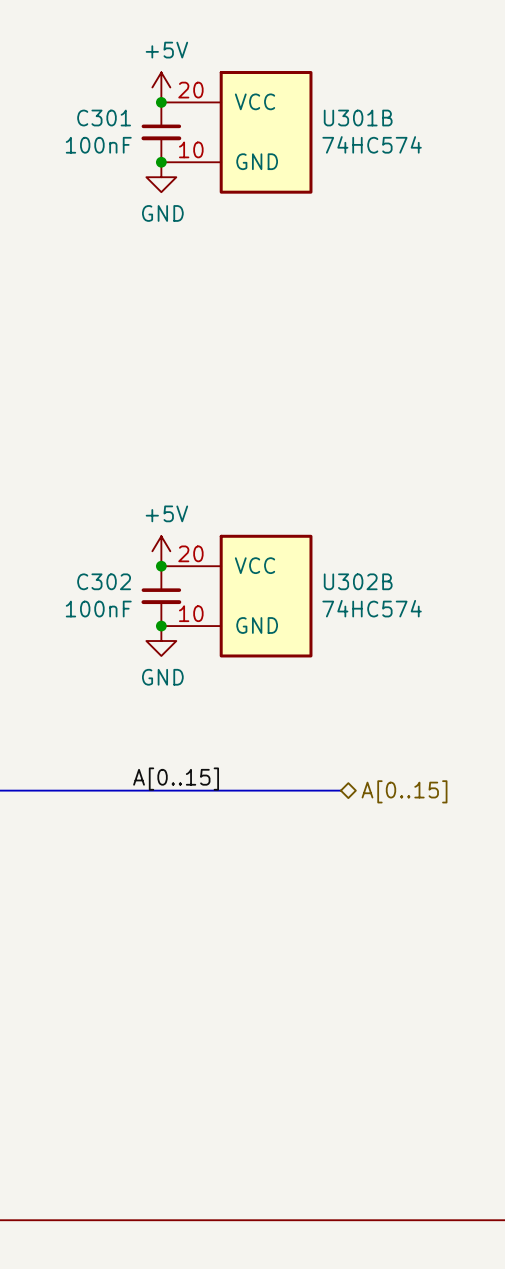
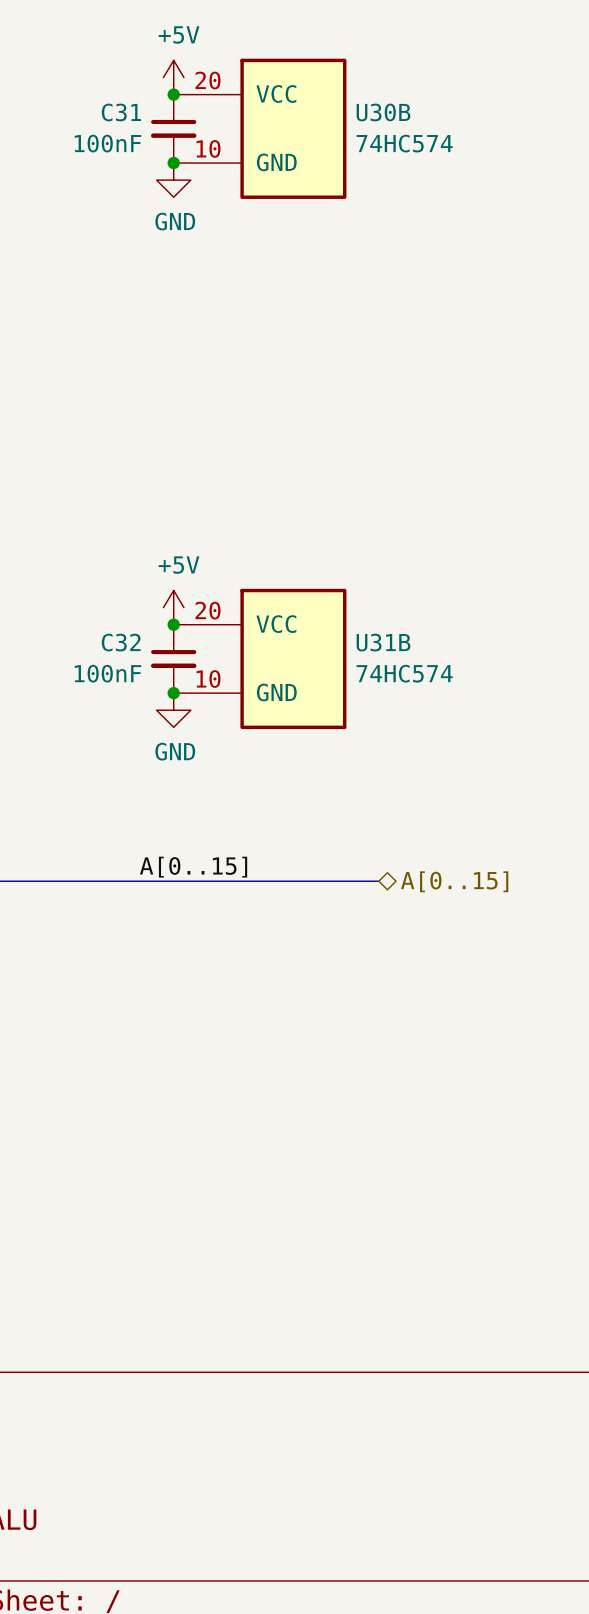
C301 name: C301 (104, 118) -> C31 (121, 112)
U301B name: U301B (358, 118) -> U30B (383, 112)
C302 name: C302 (104, 581) -> C32 (121, 642)
U302B name: U302B (358, 581) -> U31B (383, 642)

